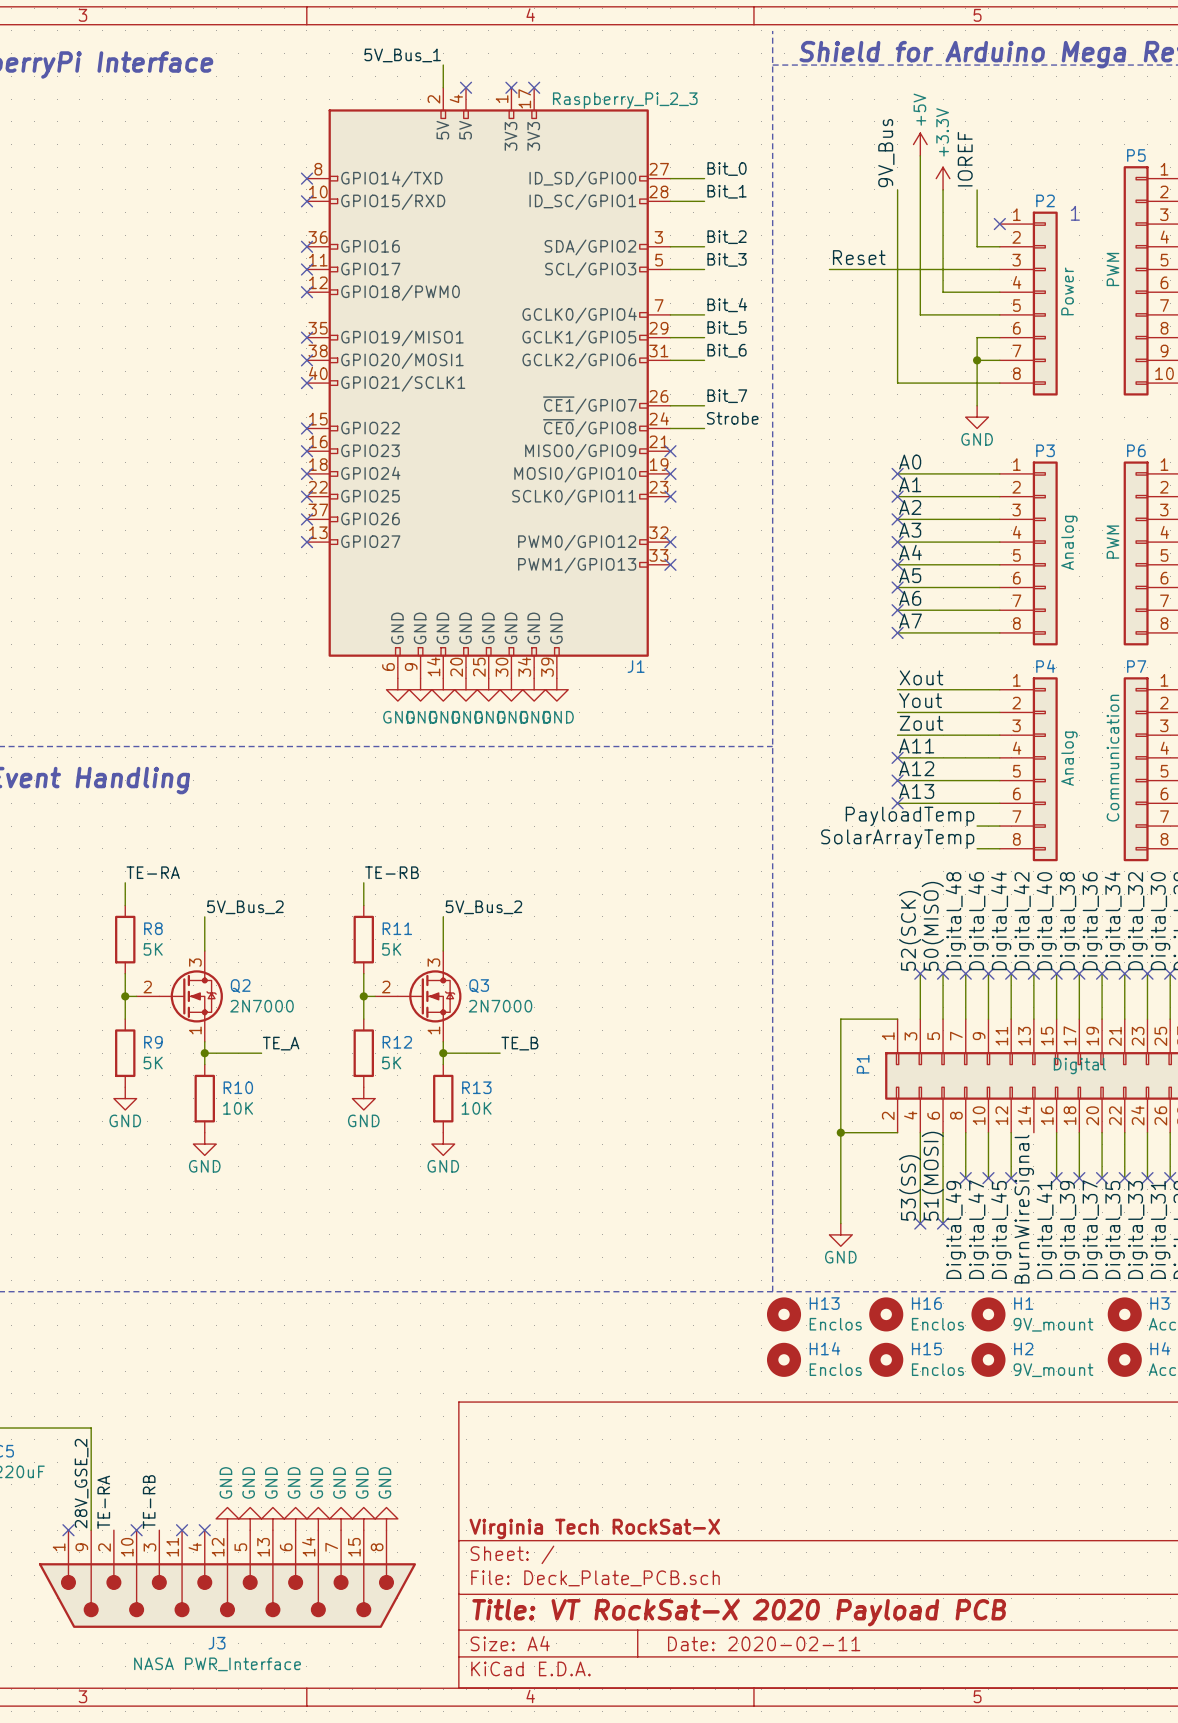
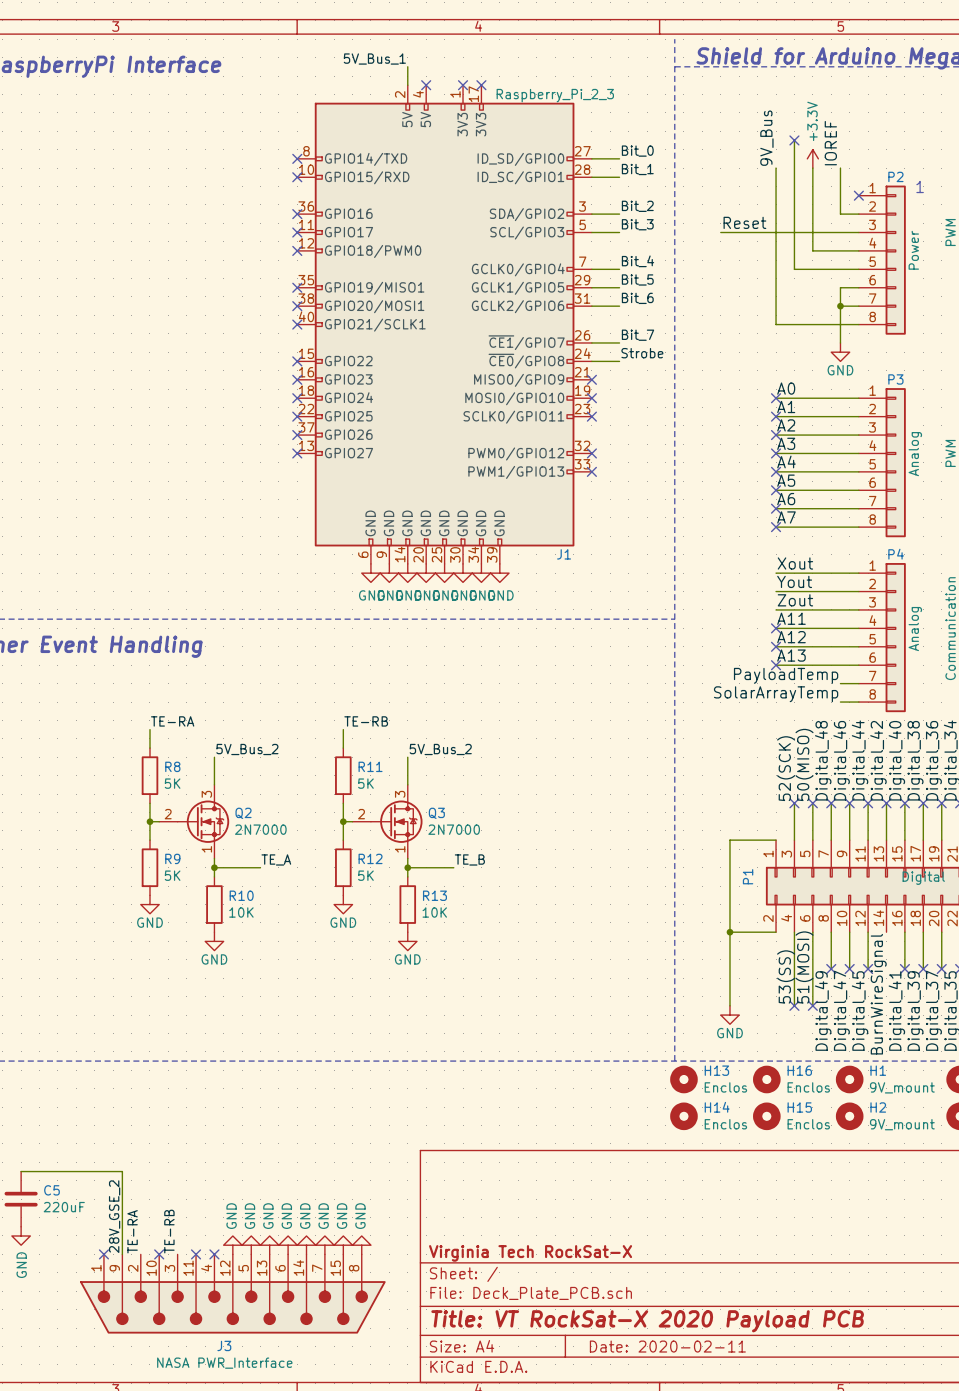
power symbol: +5V (920, 144) -> none
no-connect mark: none -> (794, 140)

